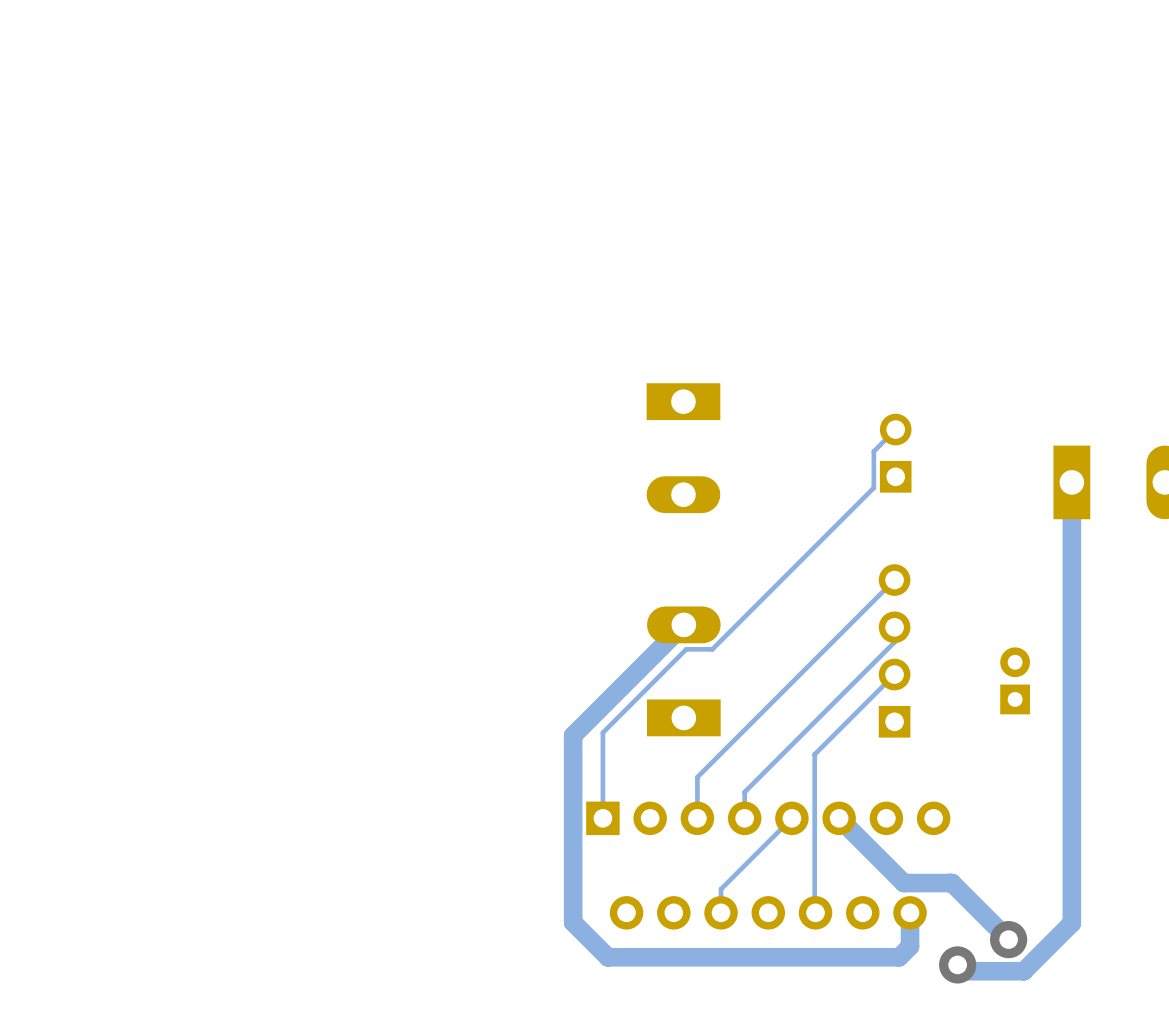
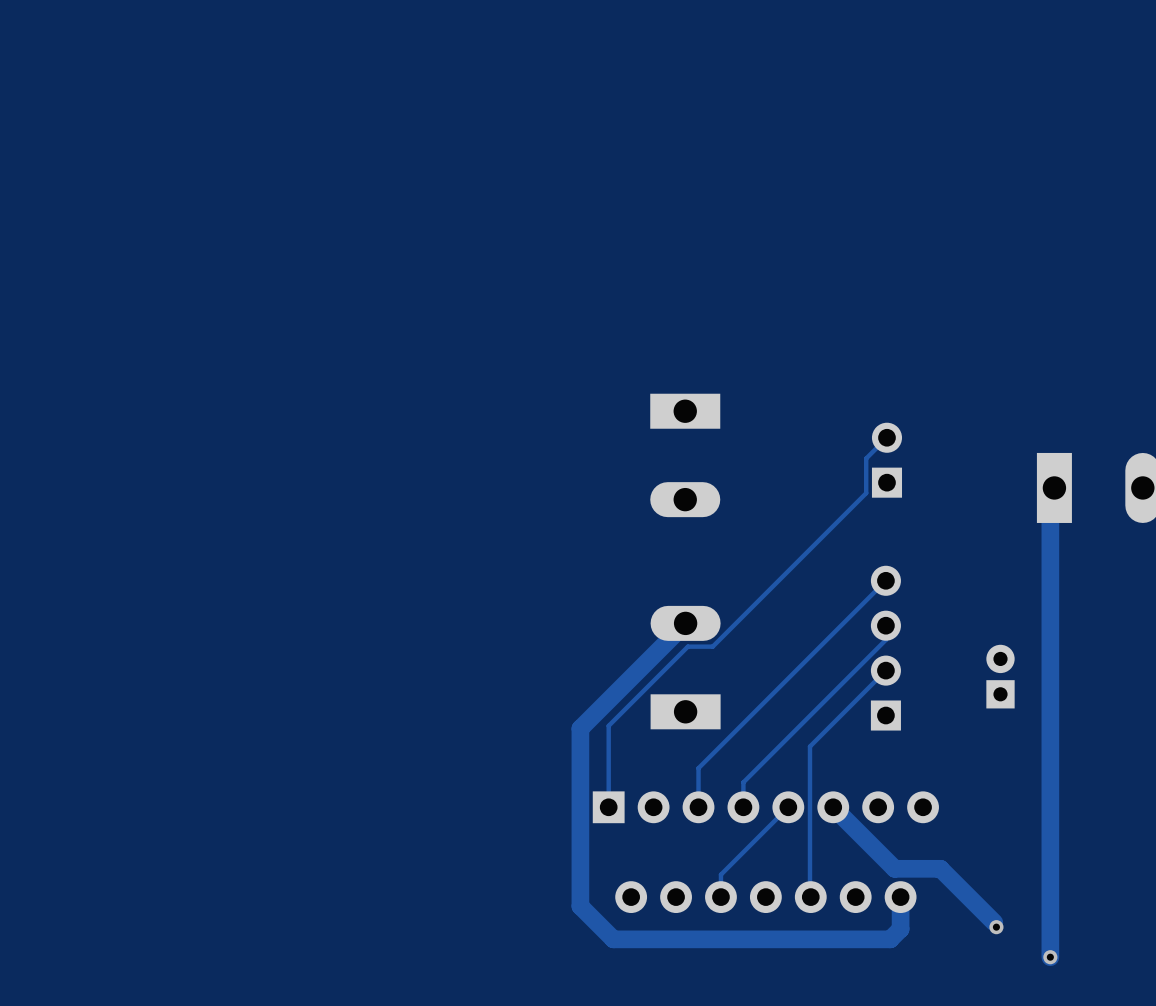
track: (1071, 482) (1071, 923) (1023, 971) (963, 971) (957, 964) -> none
track: none -> (1050, 492) (1050, 957)
via size: [990, 921, 1028, 959] -> [989, 920, 1004, 935]
via: (957, 964) -> none
via: none -> (1050, 957)

